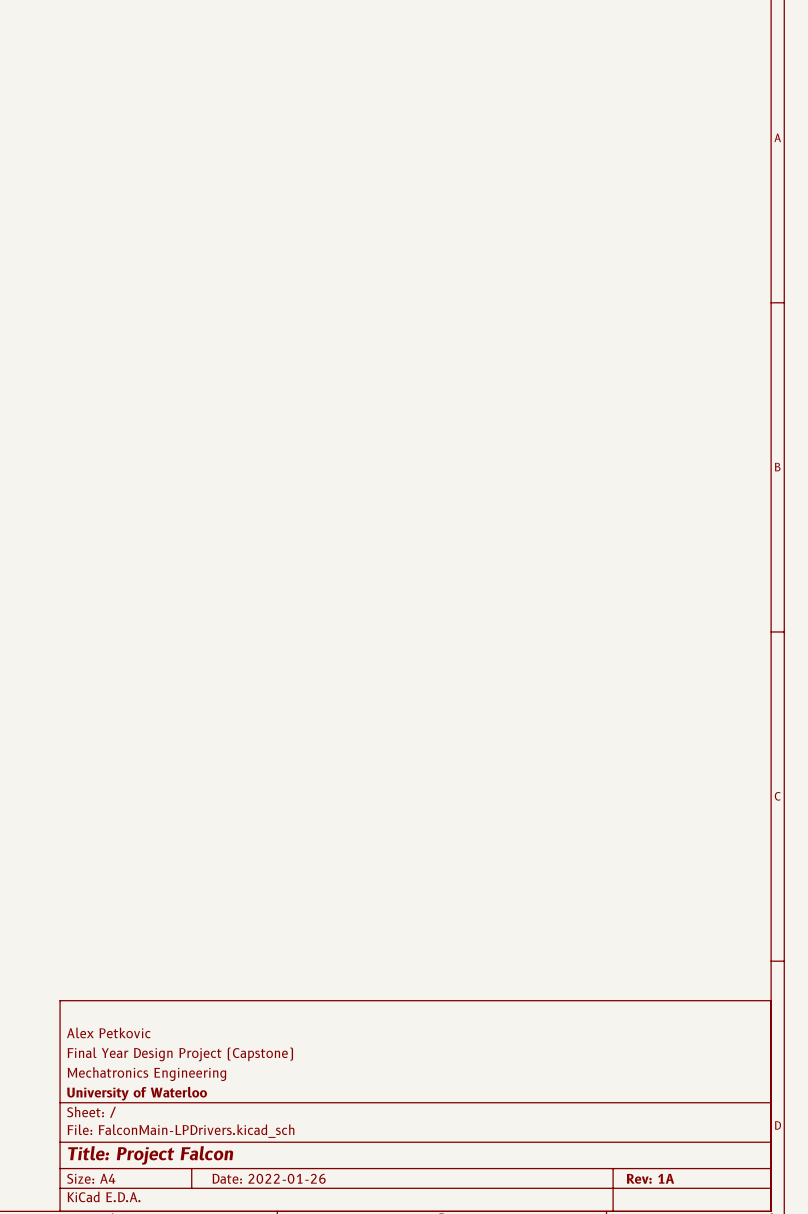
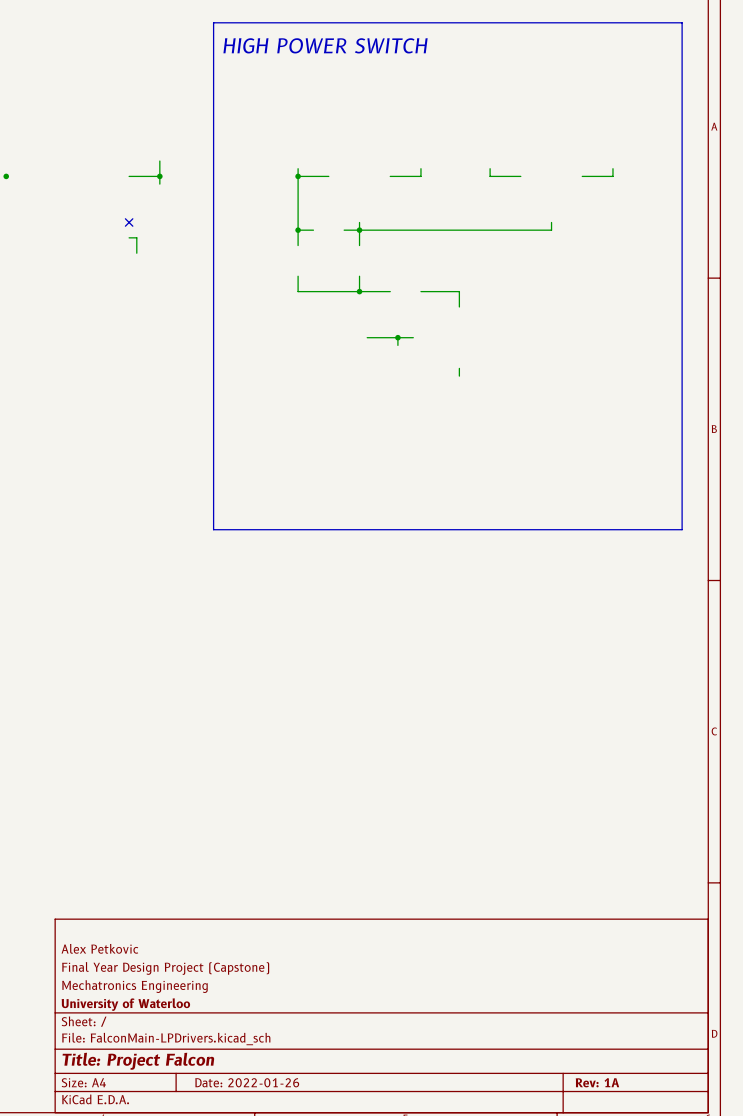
line: none -> (213, 22) (682, 22) (682, 529) (213, 529) (213, 22)
text: none -> HIGH POWER SWITCH (325, 45)
wire: none -> (159, 161) (159, 184)
wire: none -> (298, 168) (298, 245)
wire: none -> (420, 168) (420, 176) (390, 176)
wire: none -> (490, 168) (490, 176) (520, 176)
wire: none -> (612, 168) (612, 176) (582, 176)
junction: none -> (6, 176)
wire: none -> (129, 176) (159, 176)
junction: none -> (159, 176)
wire: none -> (298, 176) (328, 176)
junction: none -> (298, 176)
no-connect mark: none -> (129, 222)
wire: none -> (359, 222) (359, 245)
wire: none -> (551, 222) (551, 230) (344, 230)
wire: none -> (298, 230) (313, 230)
junction: none -> (298, 230)
junction: none -> (359, 230)
wire: none -> (129, 237) (136, 237) (136, 253)
wire: none -> (298, 276) (298, 291) (390, 291)
wire: none -> (359, 276) (359, 291)
junction: none -> (359, 291)
wire: none -> (420, 291) (459, 291) (459, 306)
wire: none -> (367, 337) (413, 337)
wire: none -> (397, 337) (397, 345)
junction: none -> (397, 337)
wire: none -> (459, 368) (459, 376)

